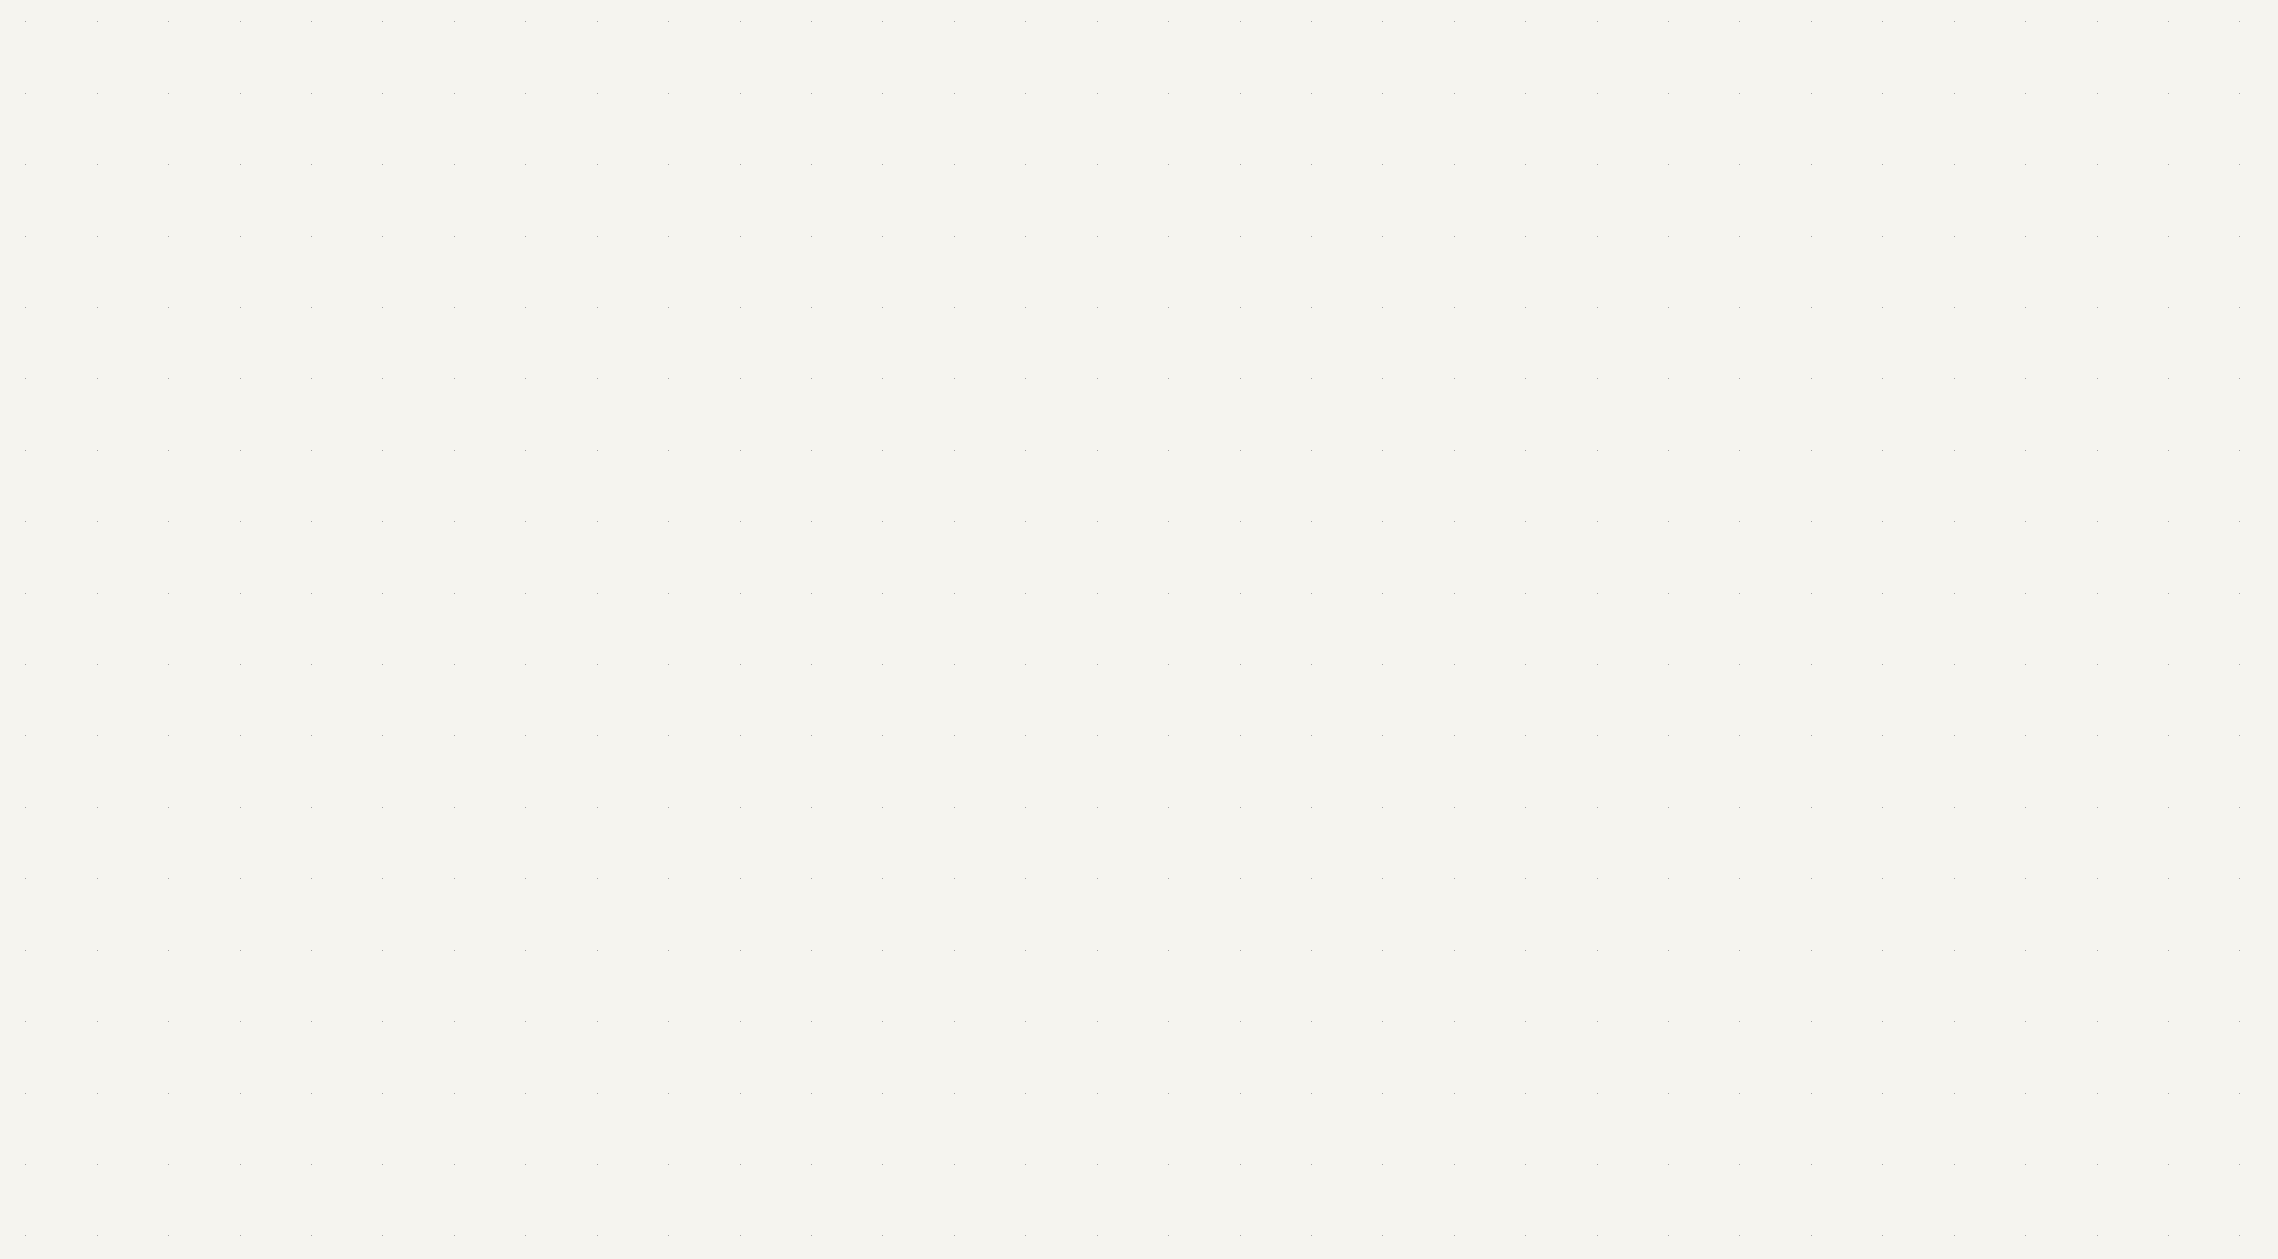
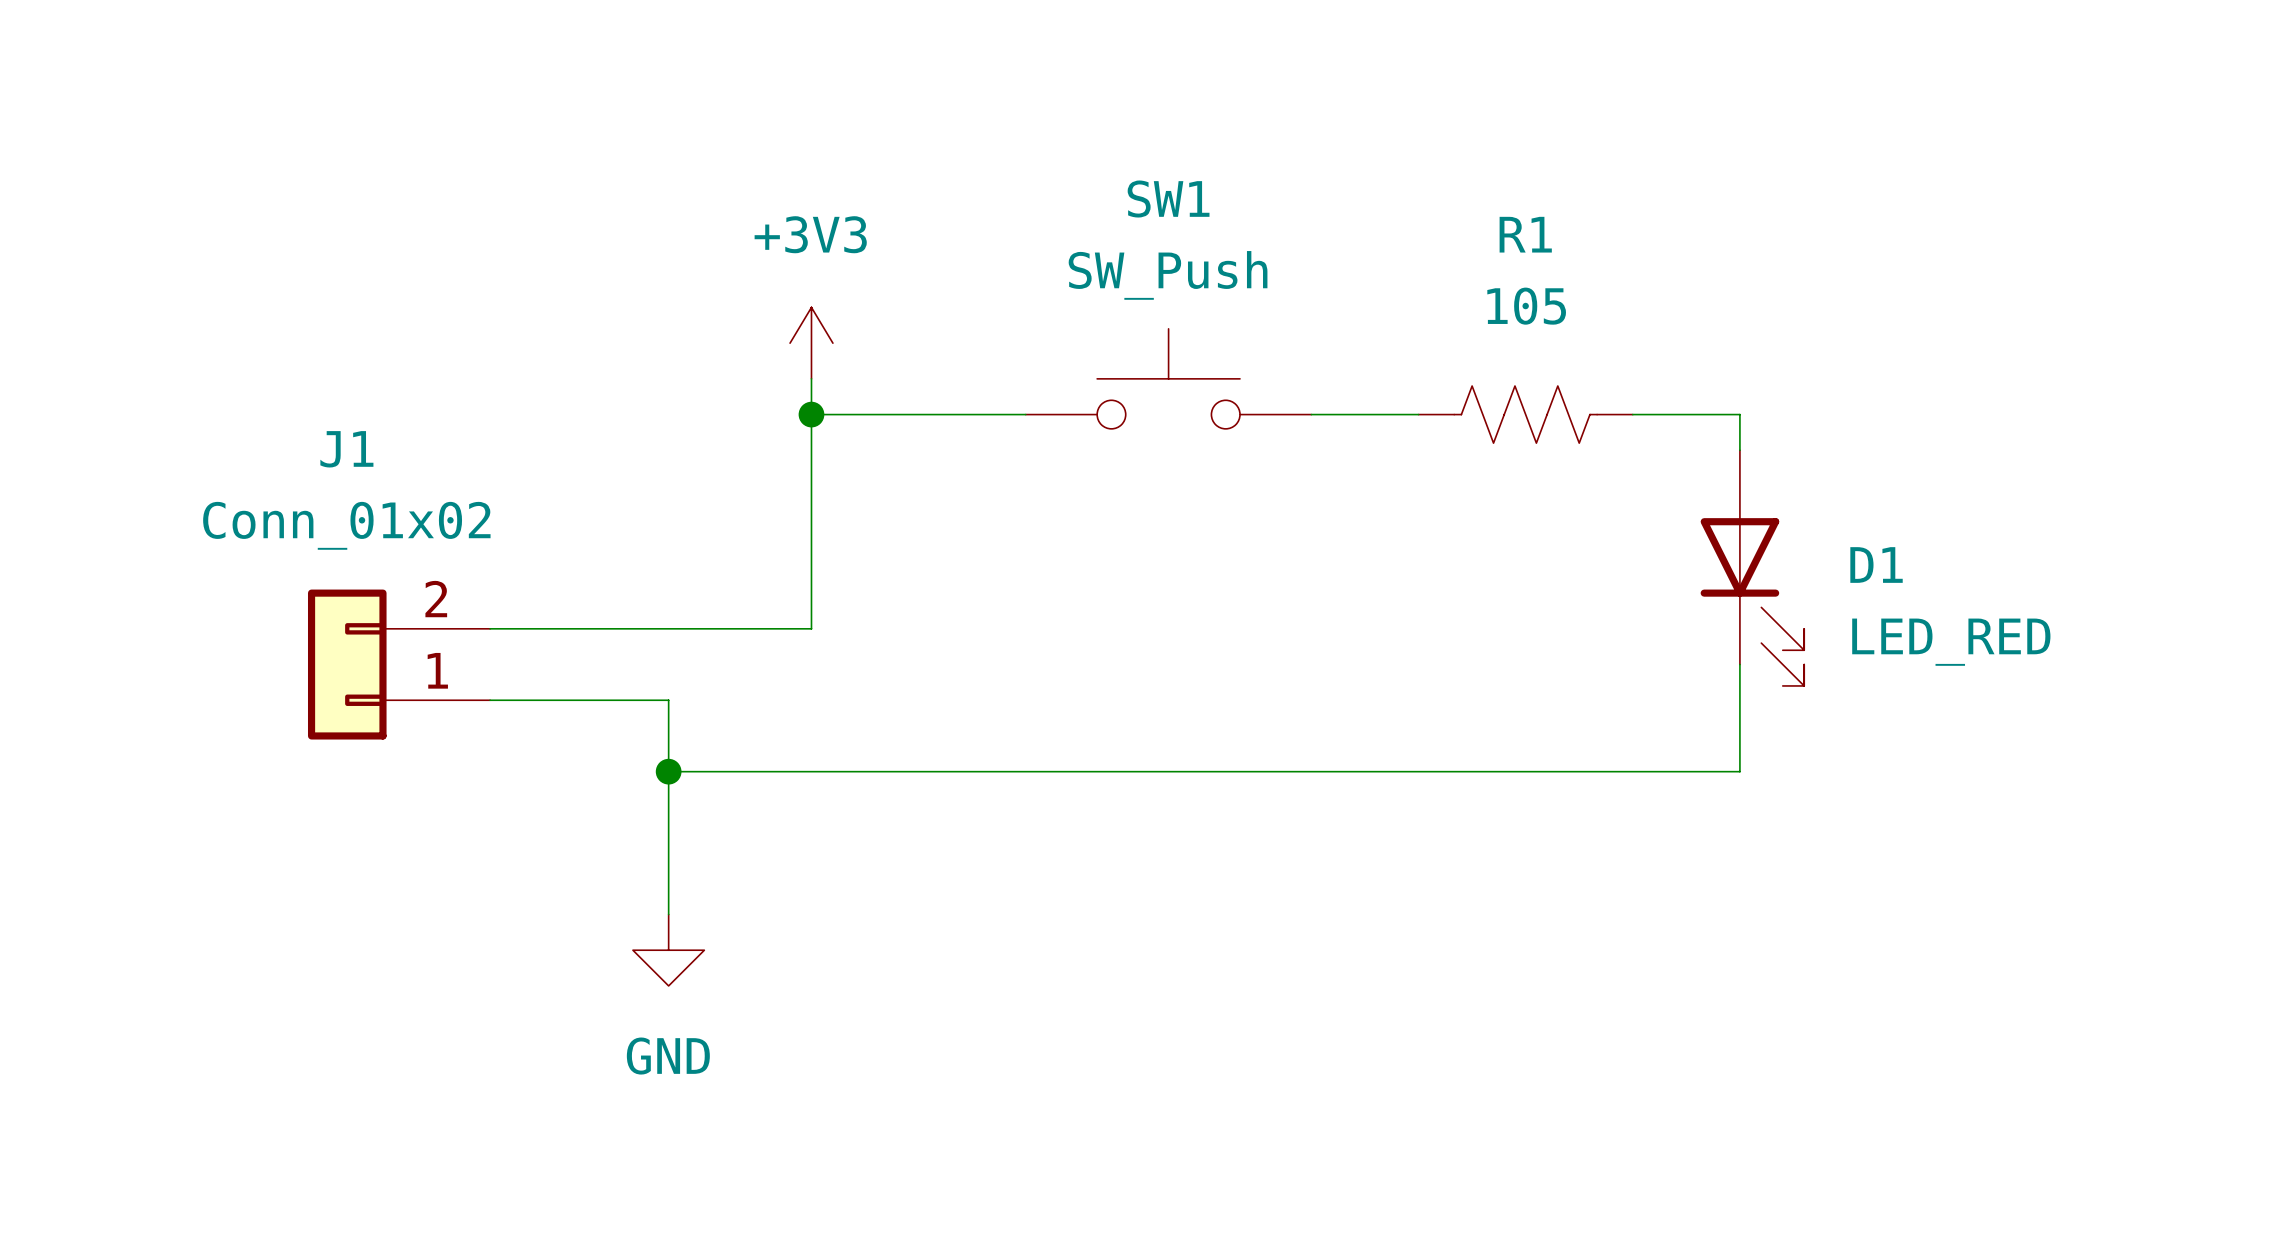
power symbol: none -> +3V3 (811, 343)
wire: none -> (811, 378) (811, 628) (490, 628)
SW1: none -> SW_Push (1168, 378)
wire: none -> (811, 414) (1025, 414)
junction: none -> (811, 414)
wire: none -> (1311, 414) (1418, 414)
R1: none -> 105 (1525, 414)
wire: none -> (1632, 414) (1739, 414) (1739, 450)
D1: none -> LED_RED (1752, 568)
J1: none -> Conn_01x02 (399, 664)
wire: none -> (1739, 664) (1739, 771) (668, 771)
wire: none -> (490, 700) (668, 700) (668, 914)
junction: none -> (668, 771)
power symbol: none -> GND (668, 950)

